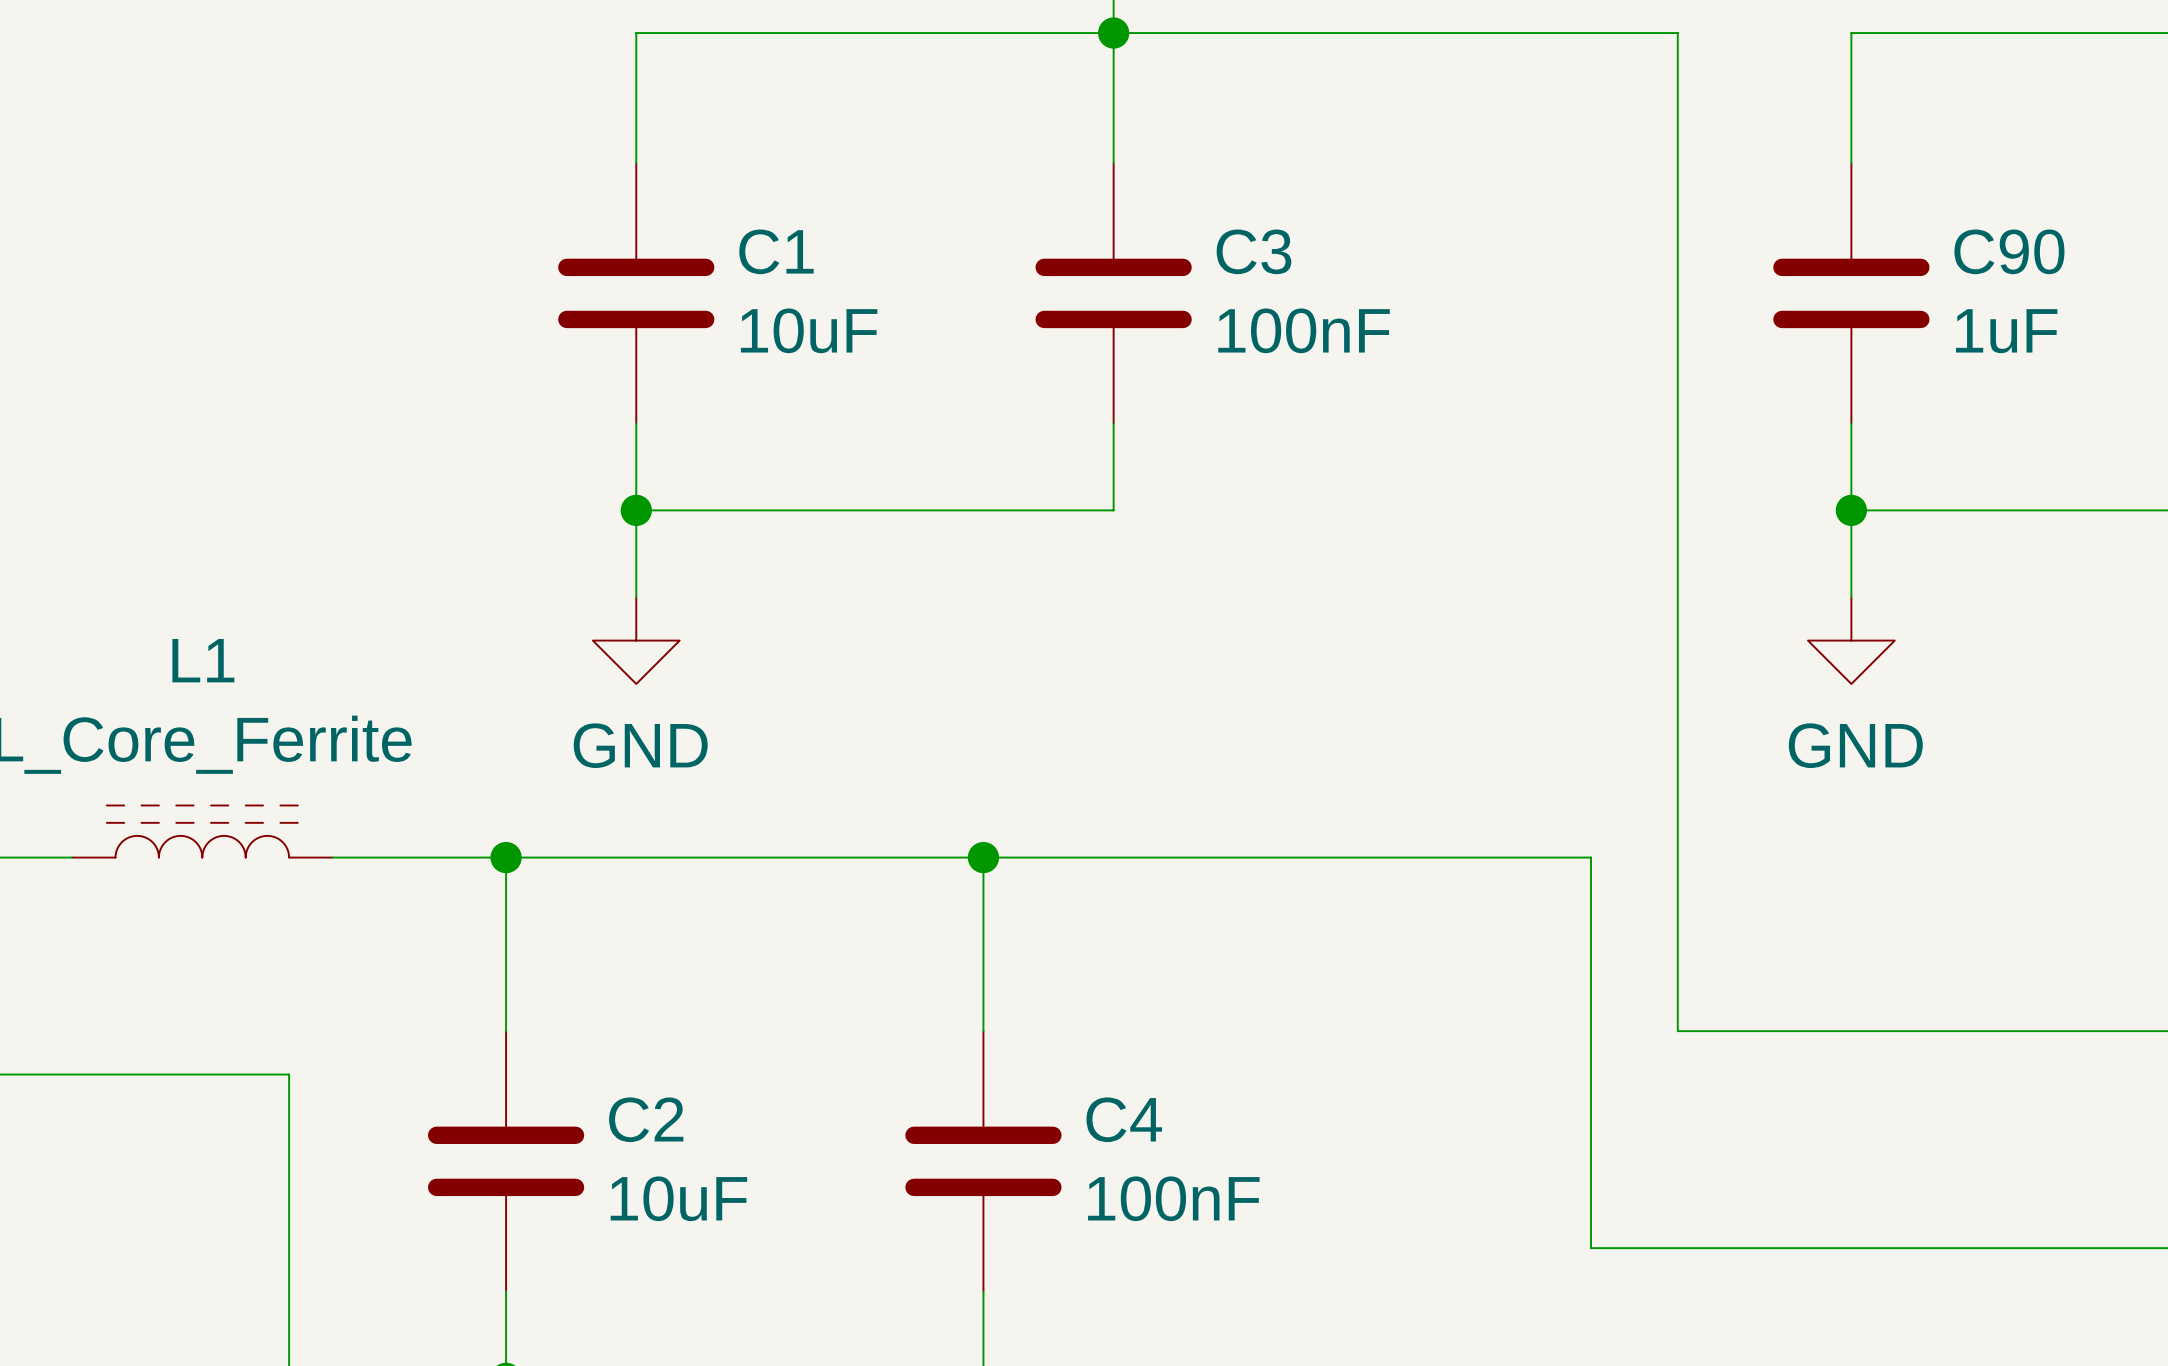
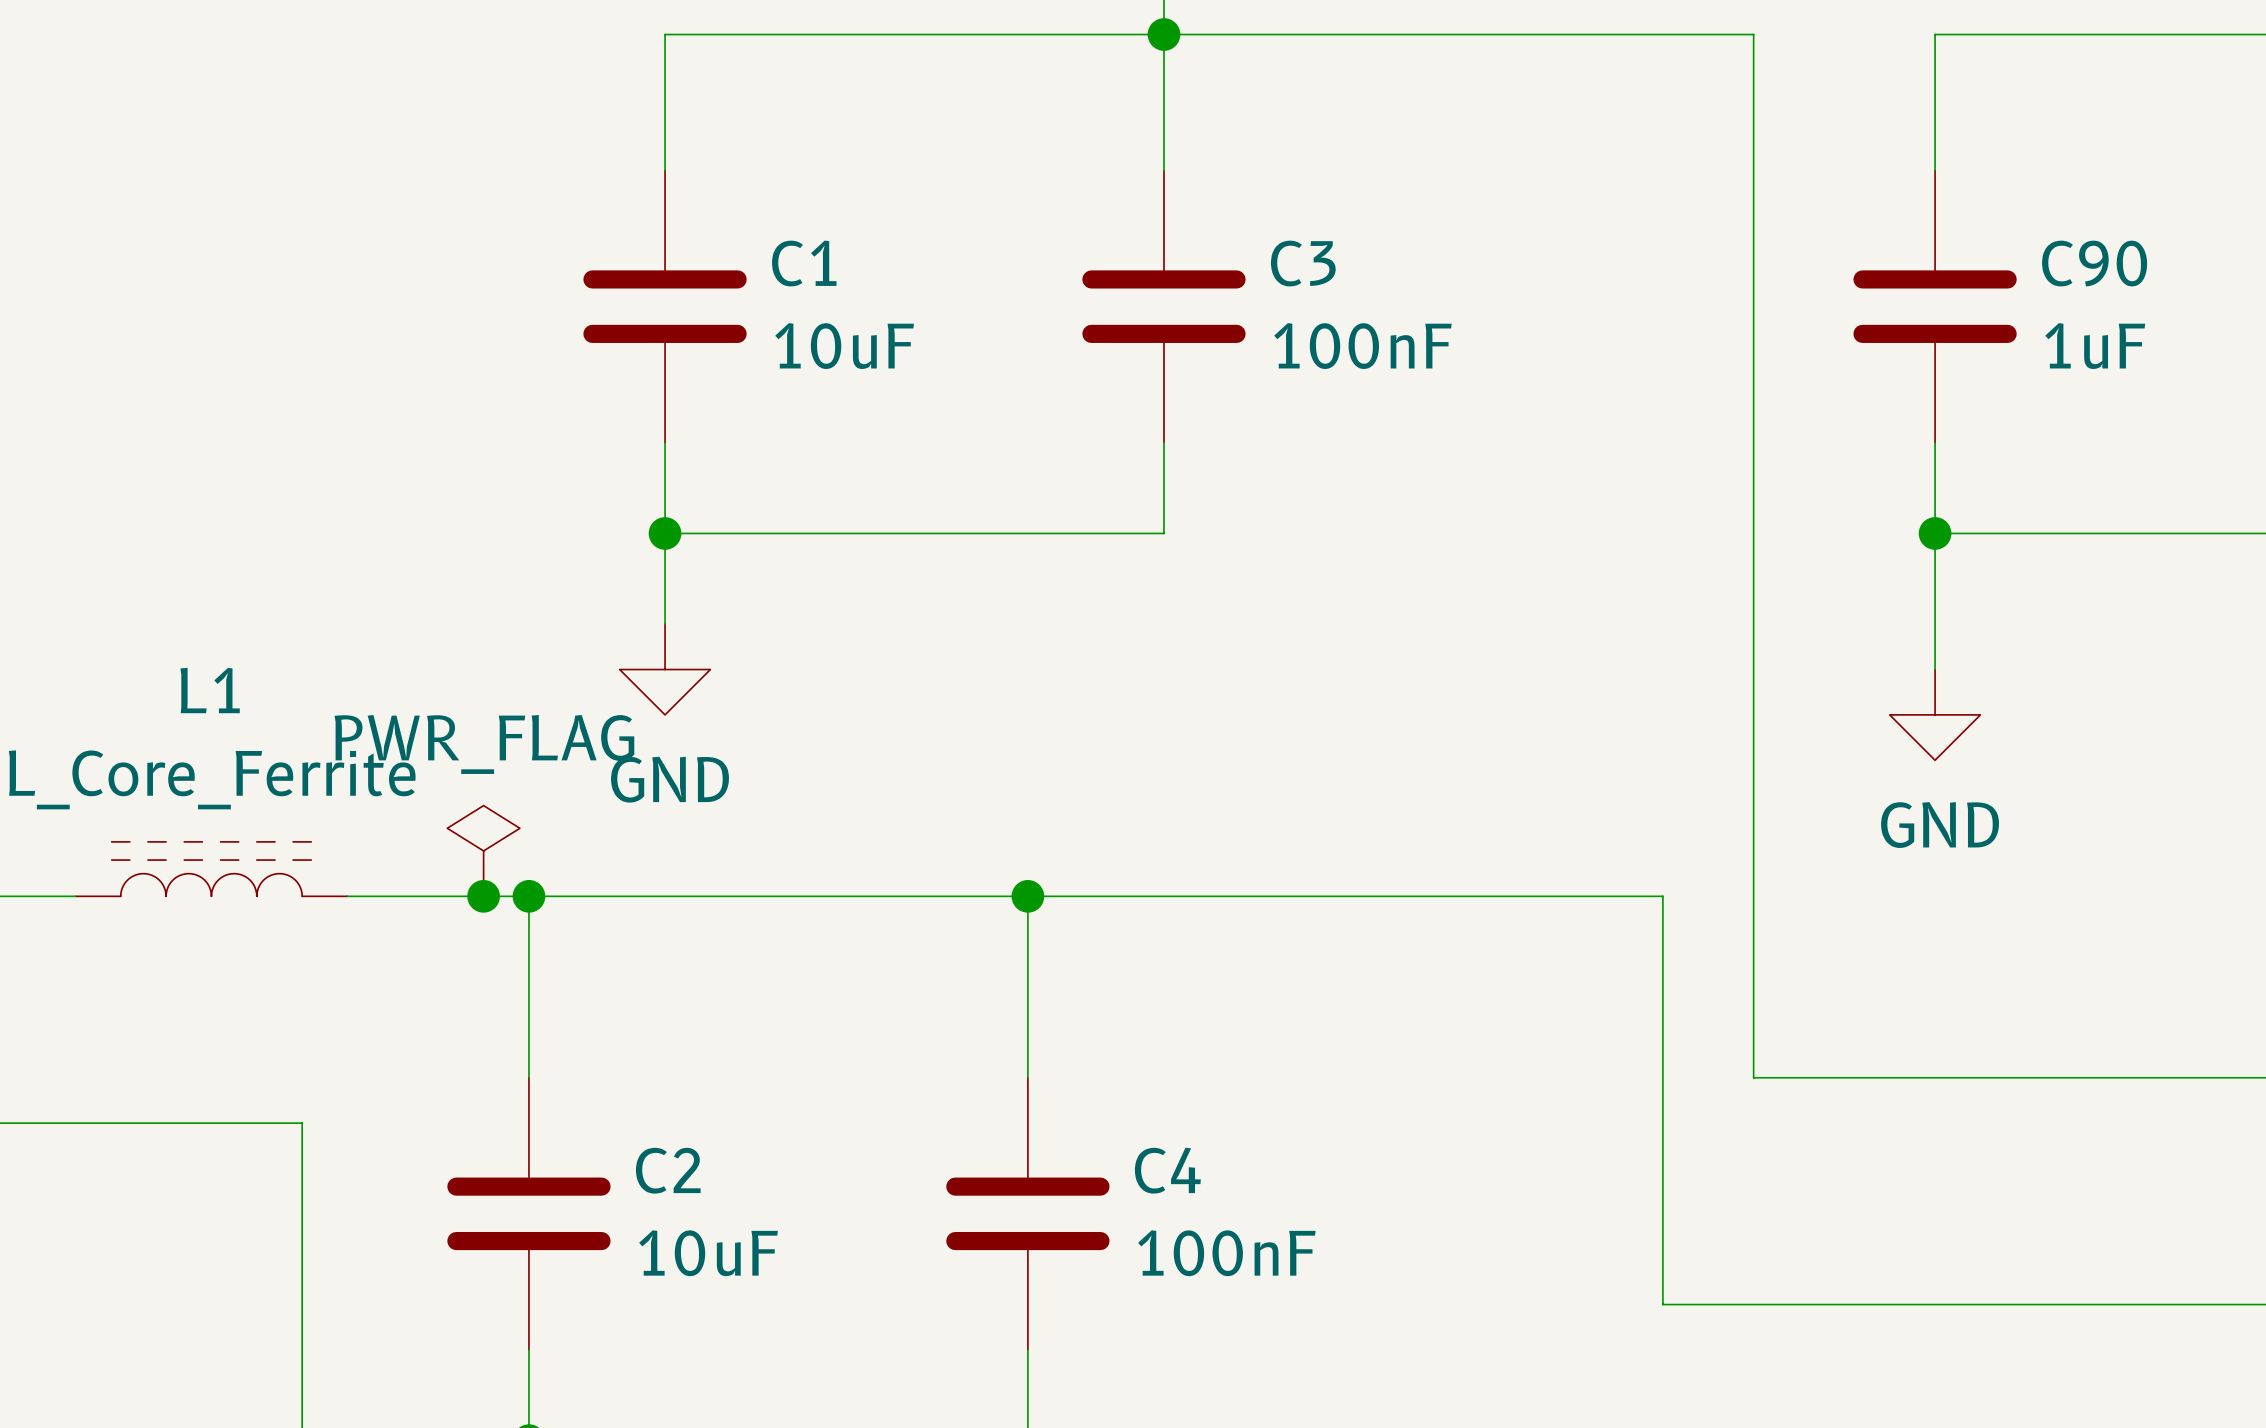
power symbol position: GND (1851, 640) -> GND (1935, 714)
power symbol: none -> PWR_FLAG (483, 850)
junction: none -> (483, 896)

